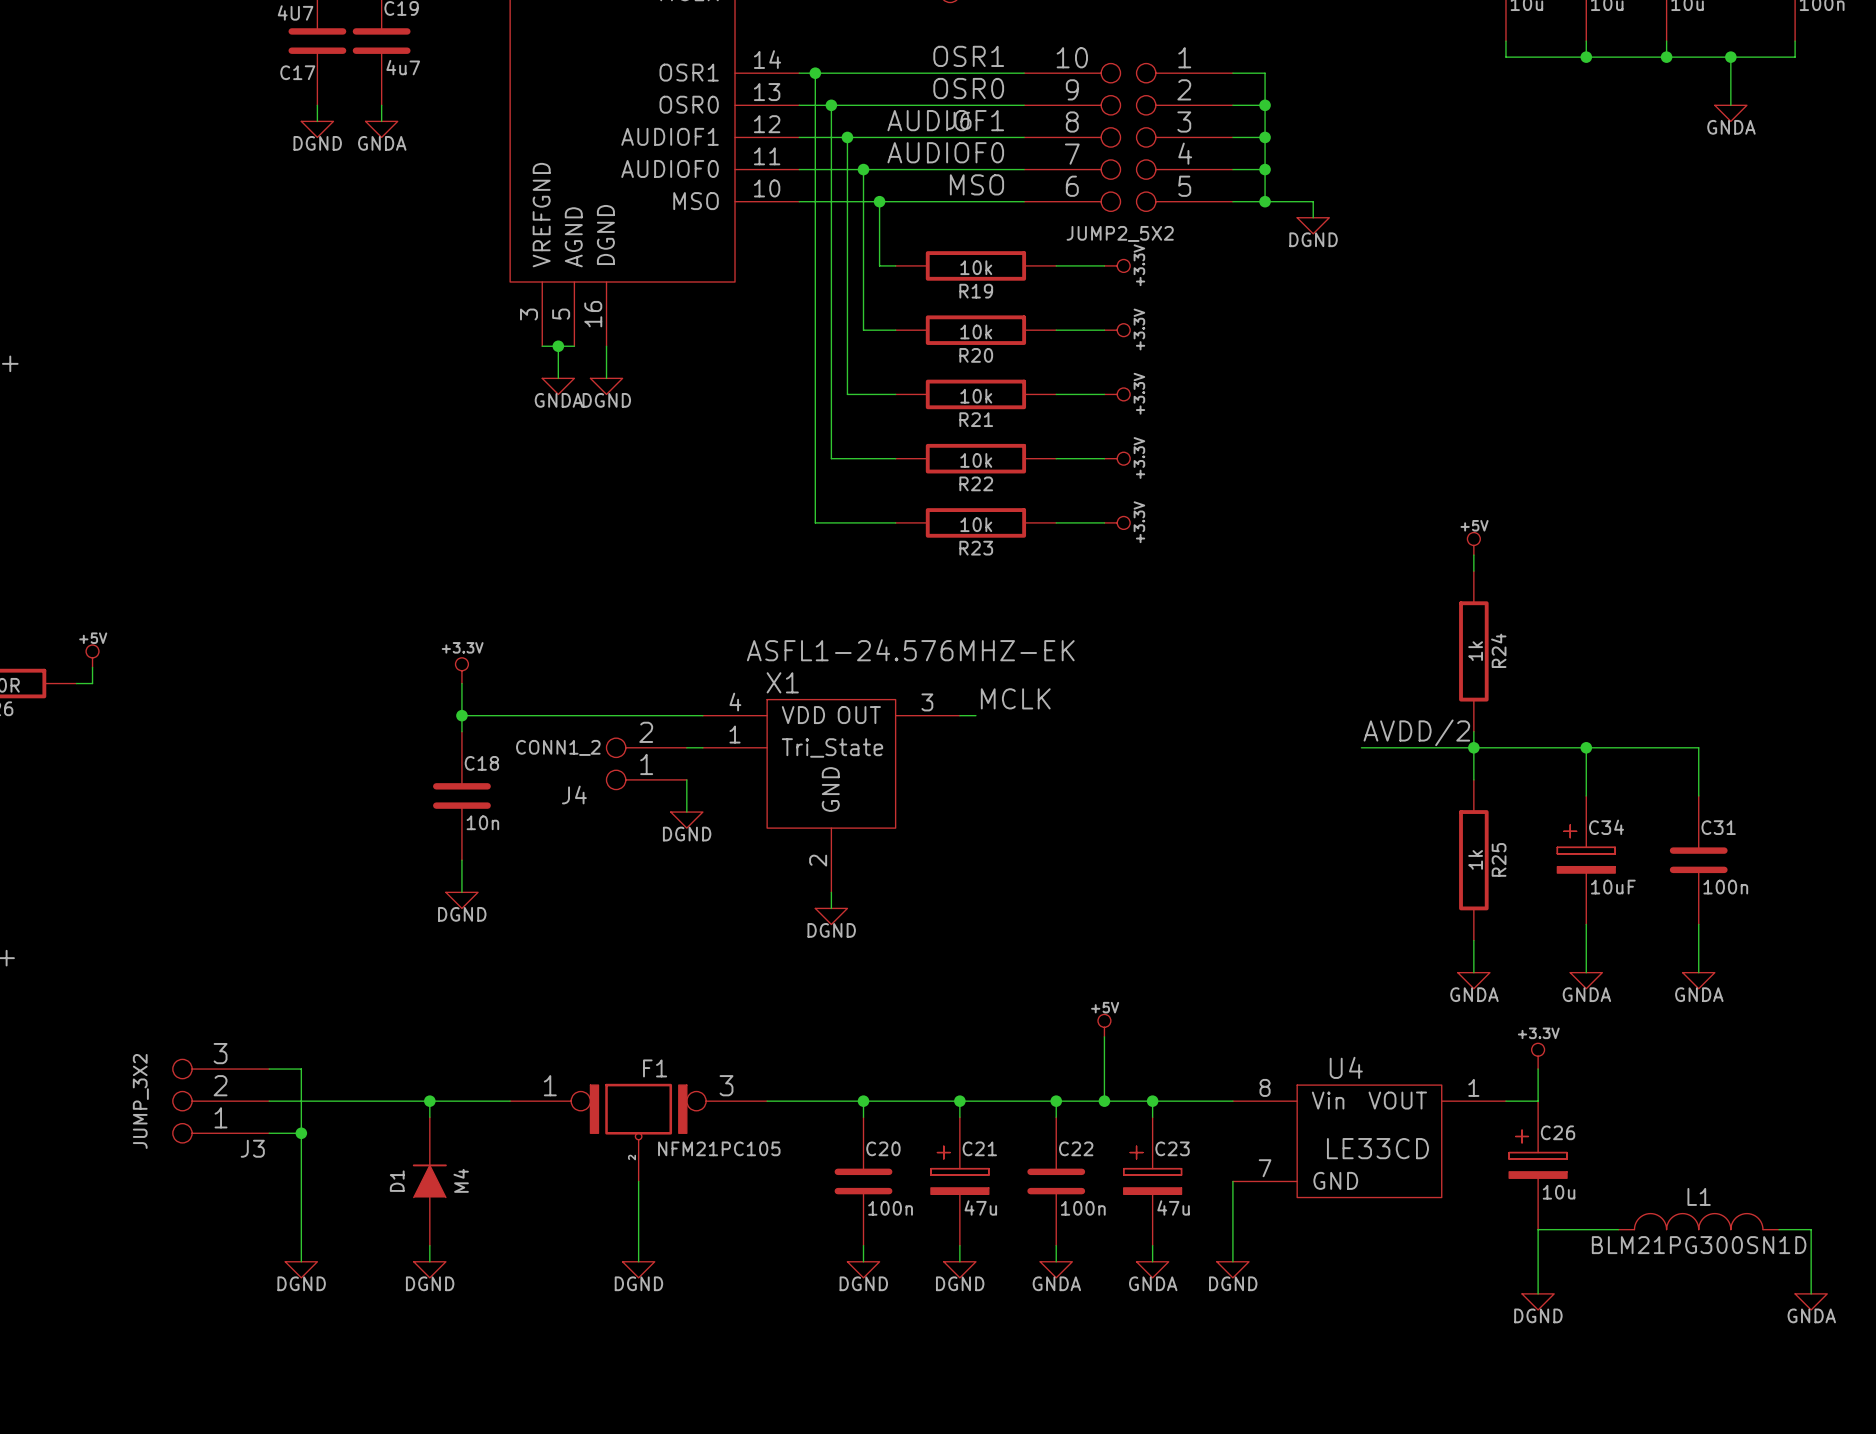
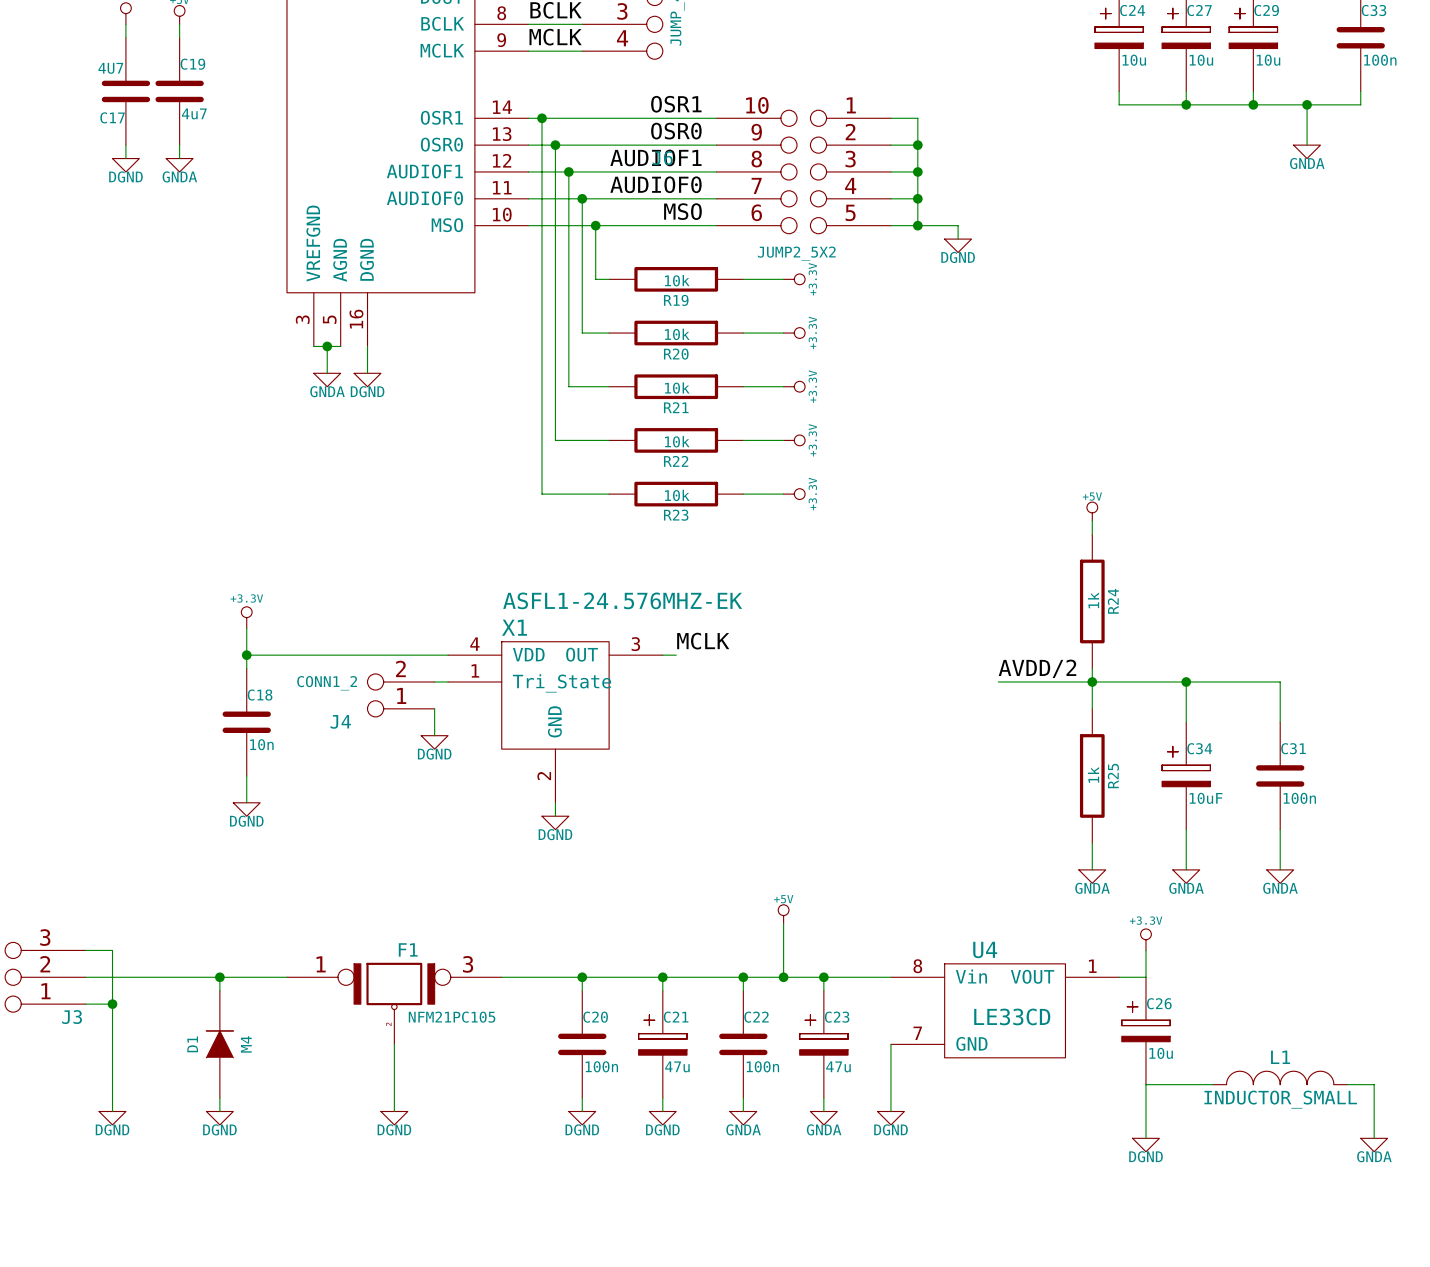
L1 value: BLM21PG300SN1D (1699, 1245) -> INDUCTOR_SMALL (1280, 1099)

